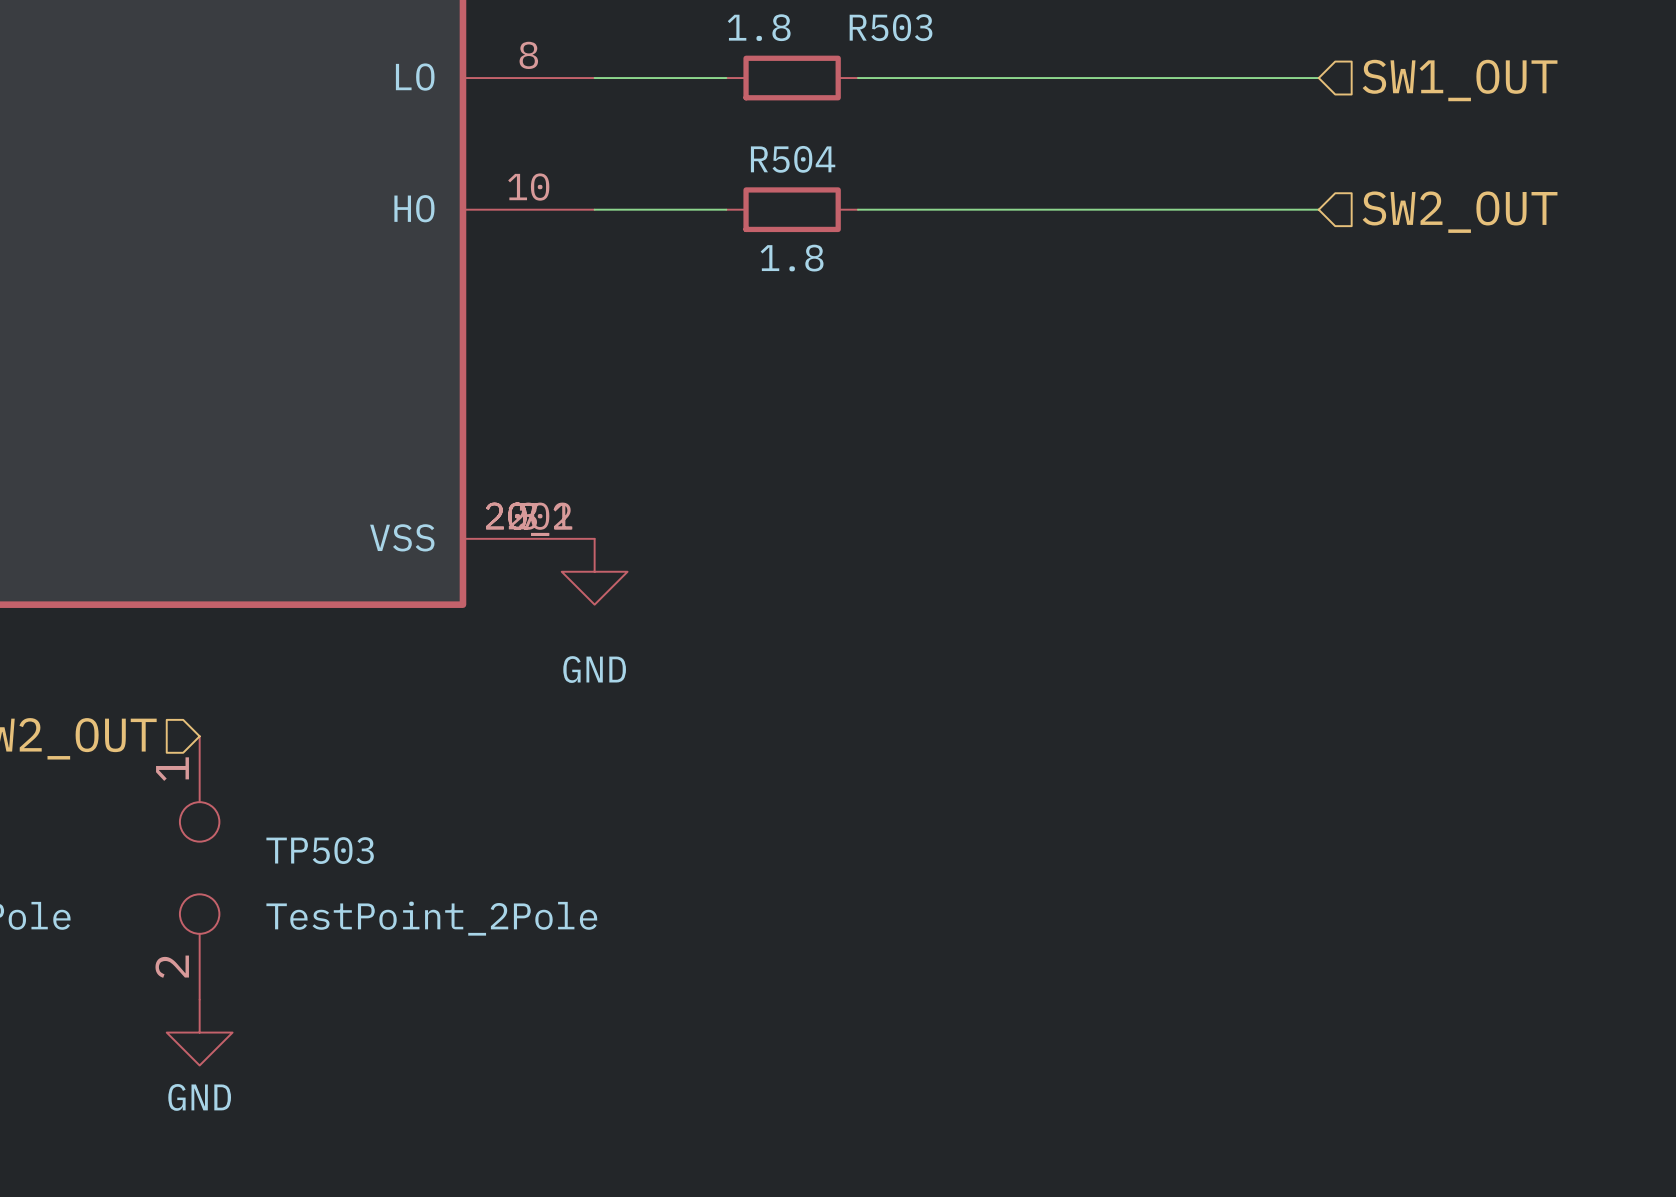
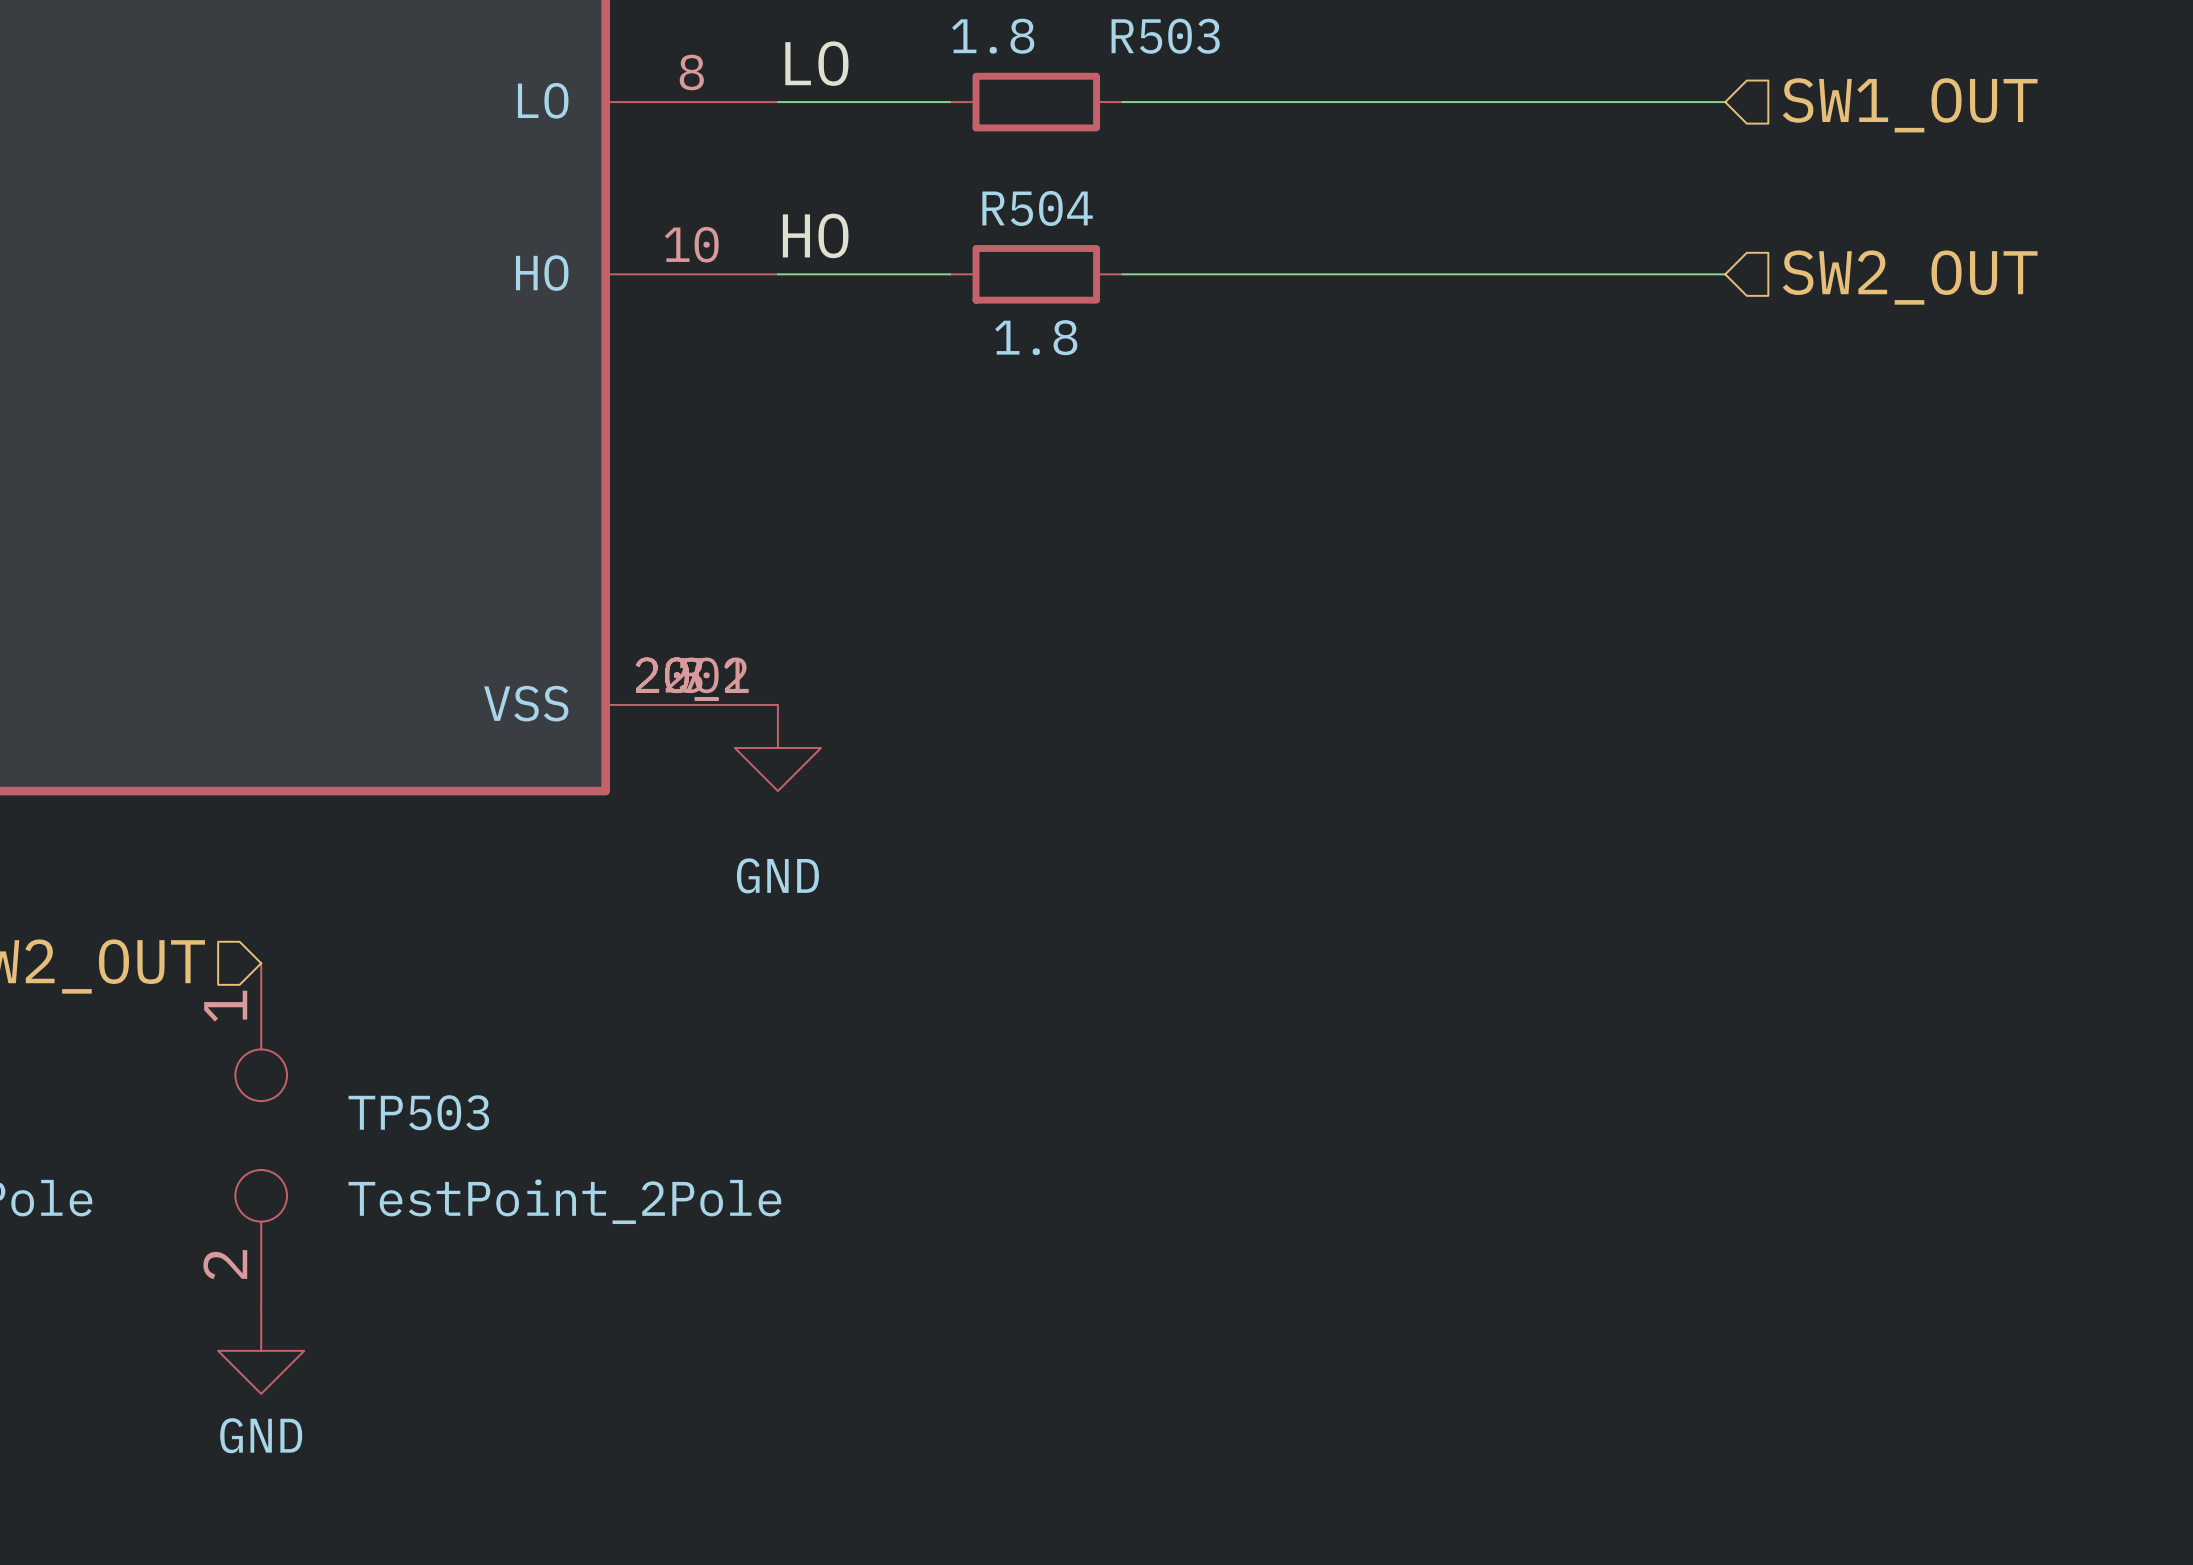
label: none -> LO (816, 63)
label: none -> HO (815, 235)

